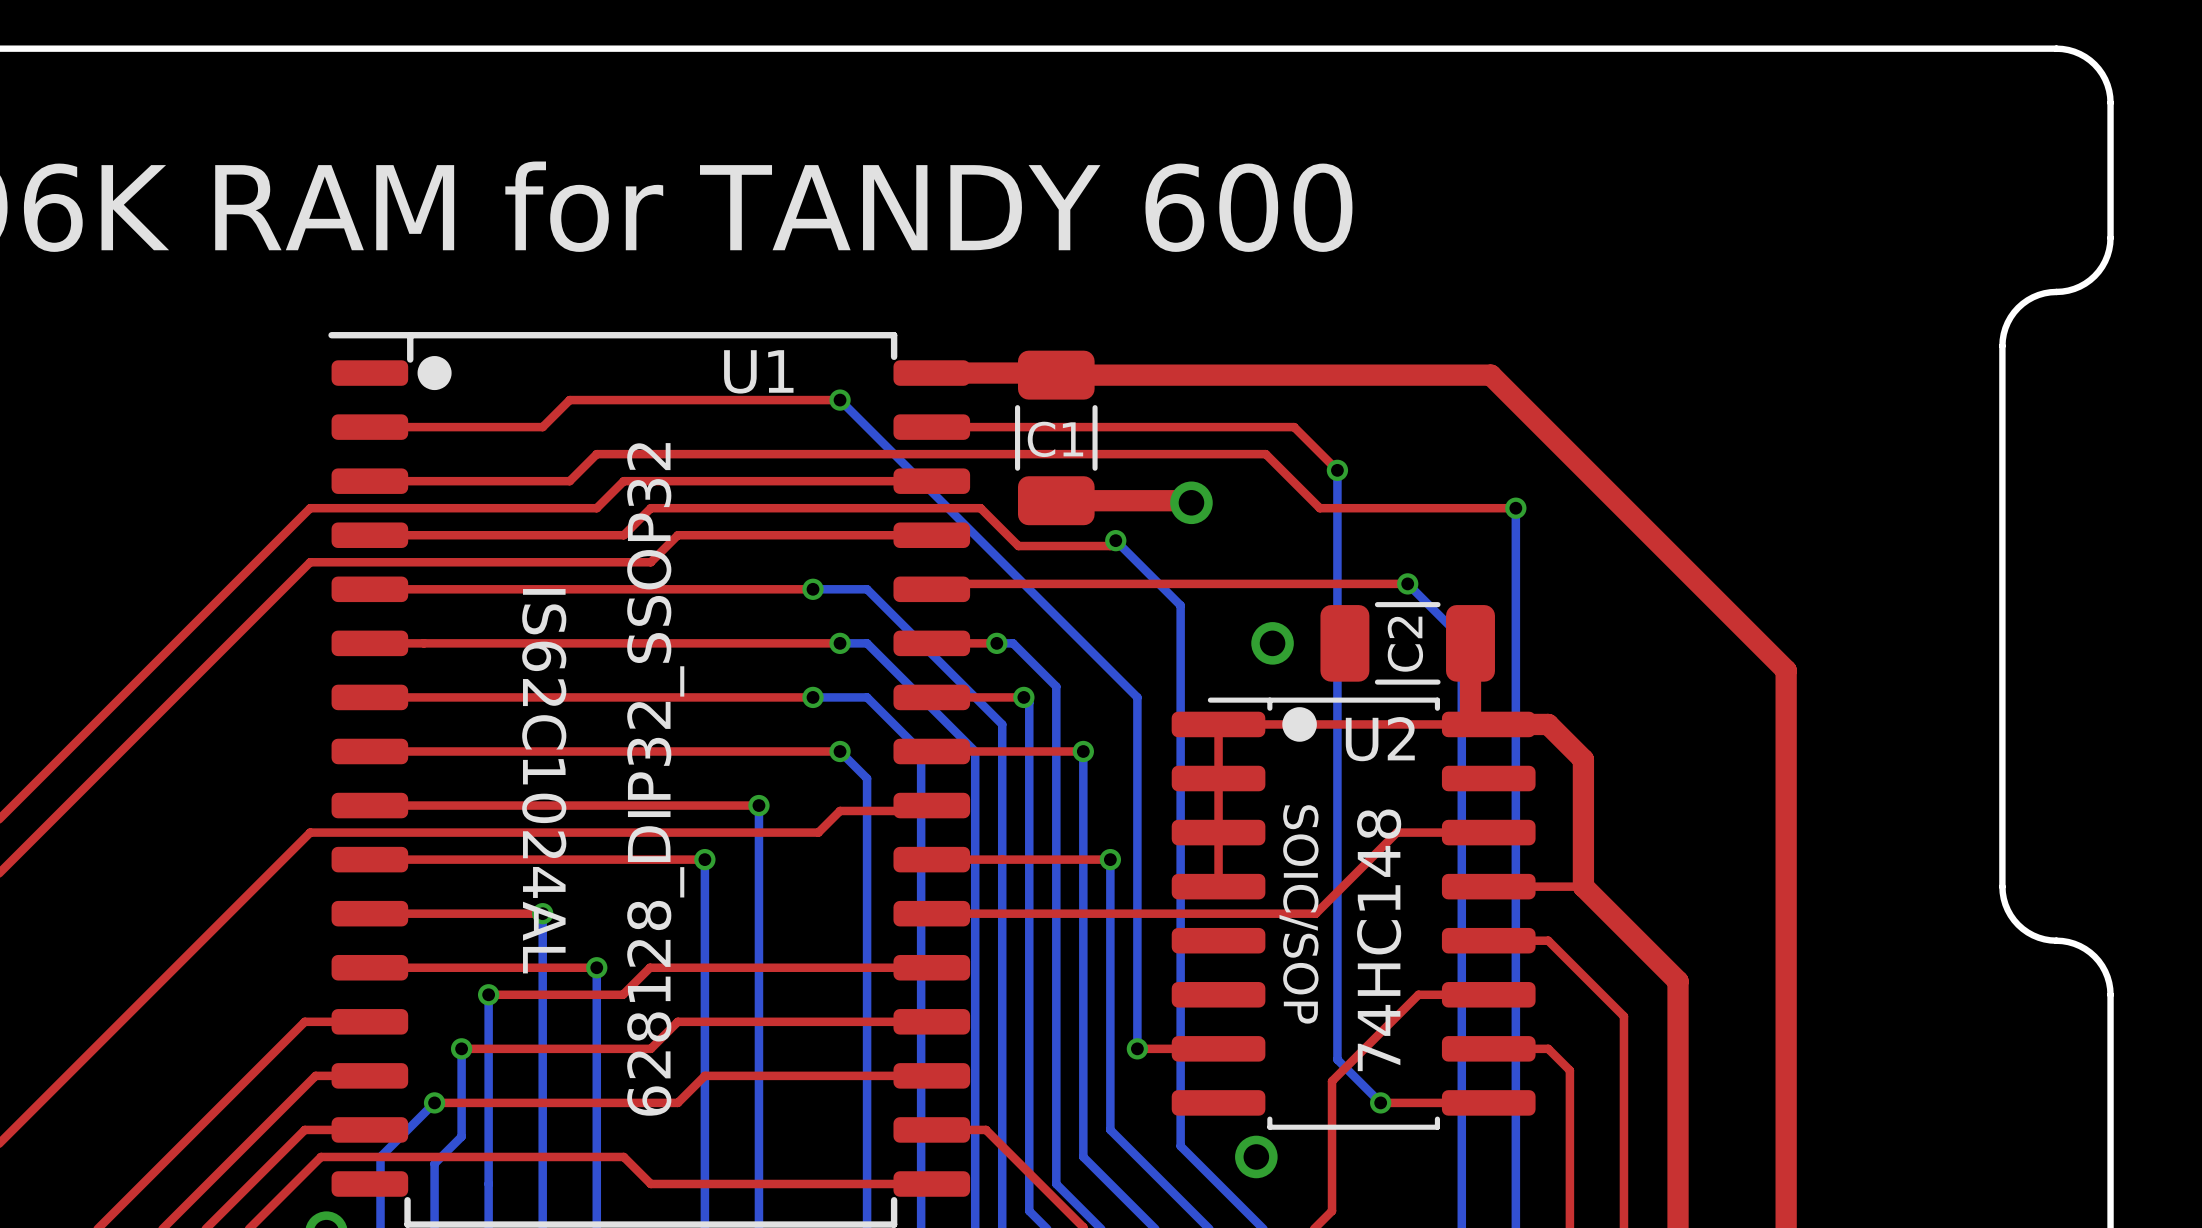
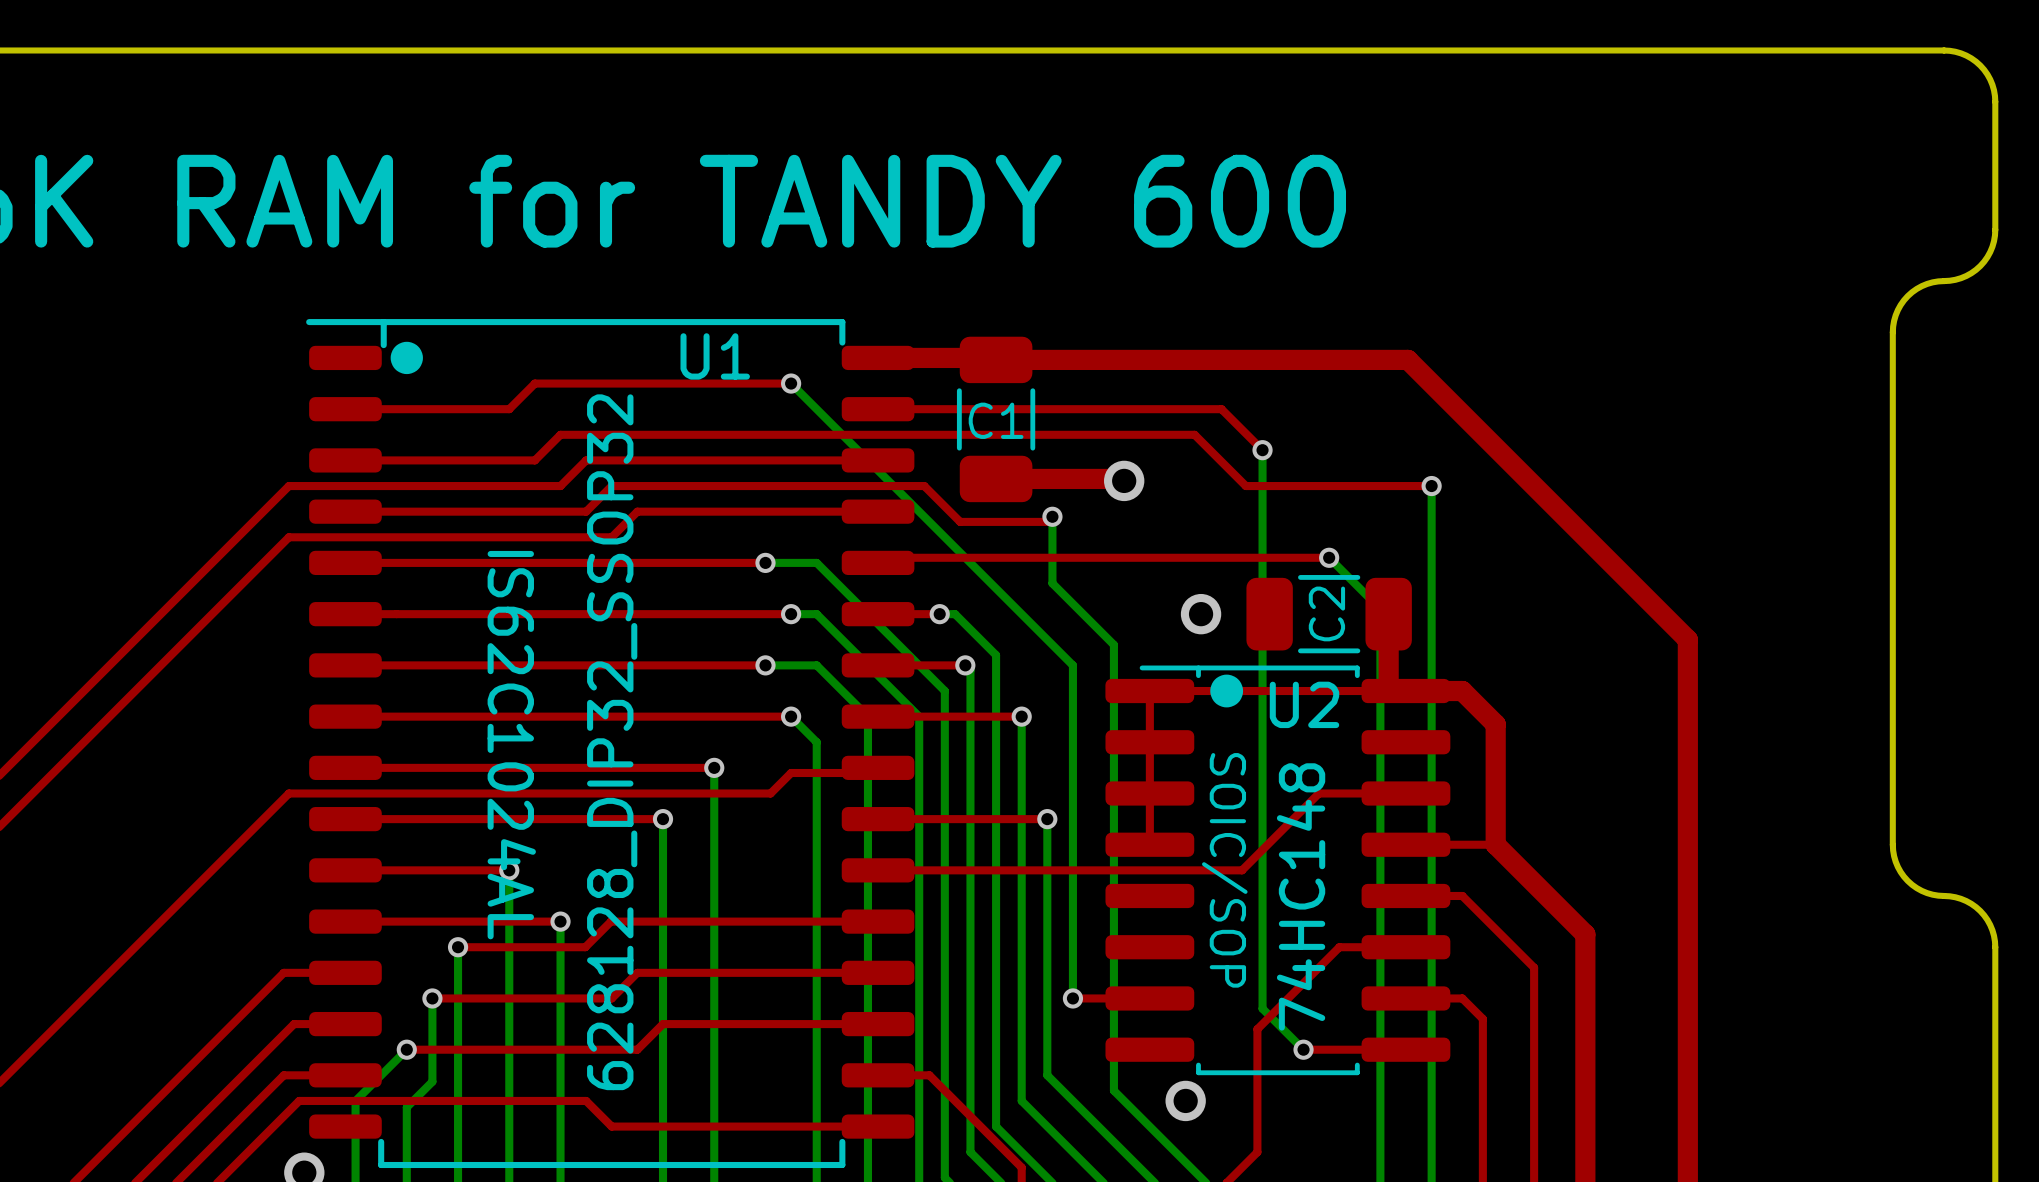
bottom track: (1115, 540) (1180, 605) (1180, 675) -> (1052, 516) (1052, 583) (1113, 644)

